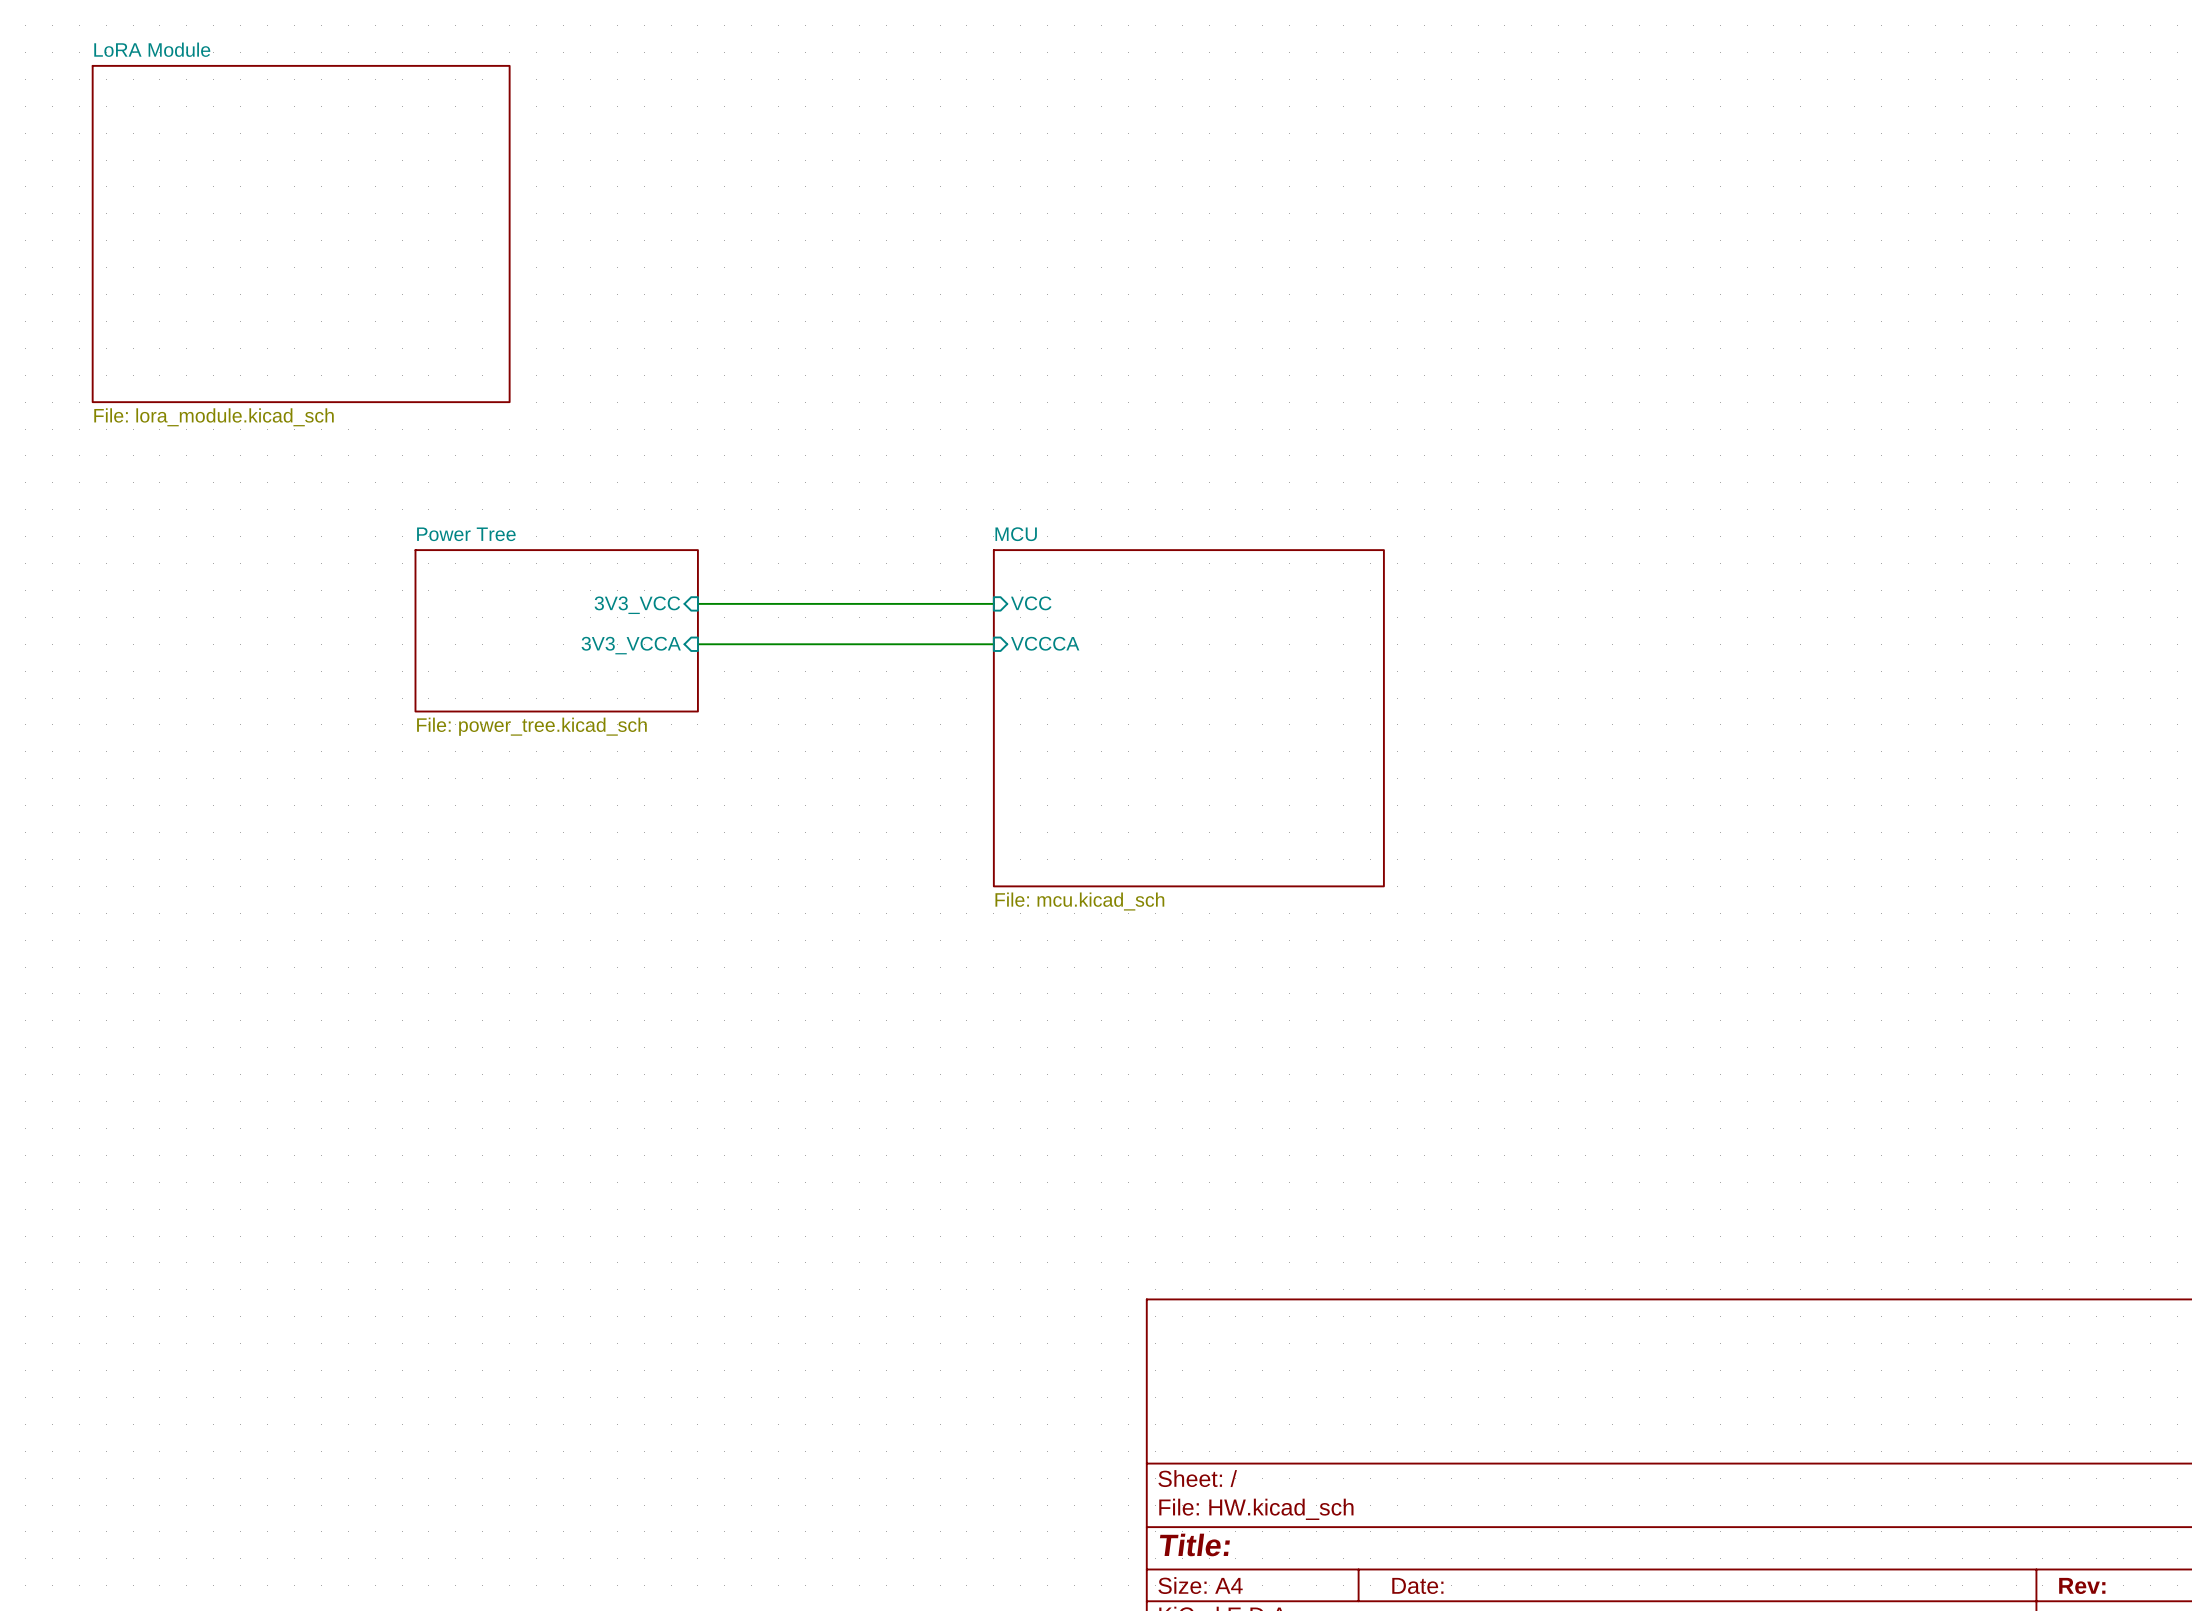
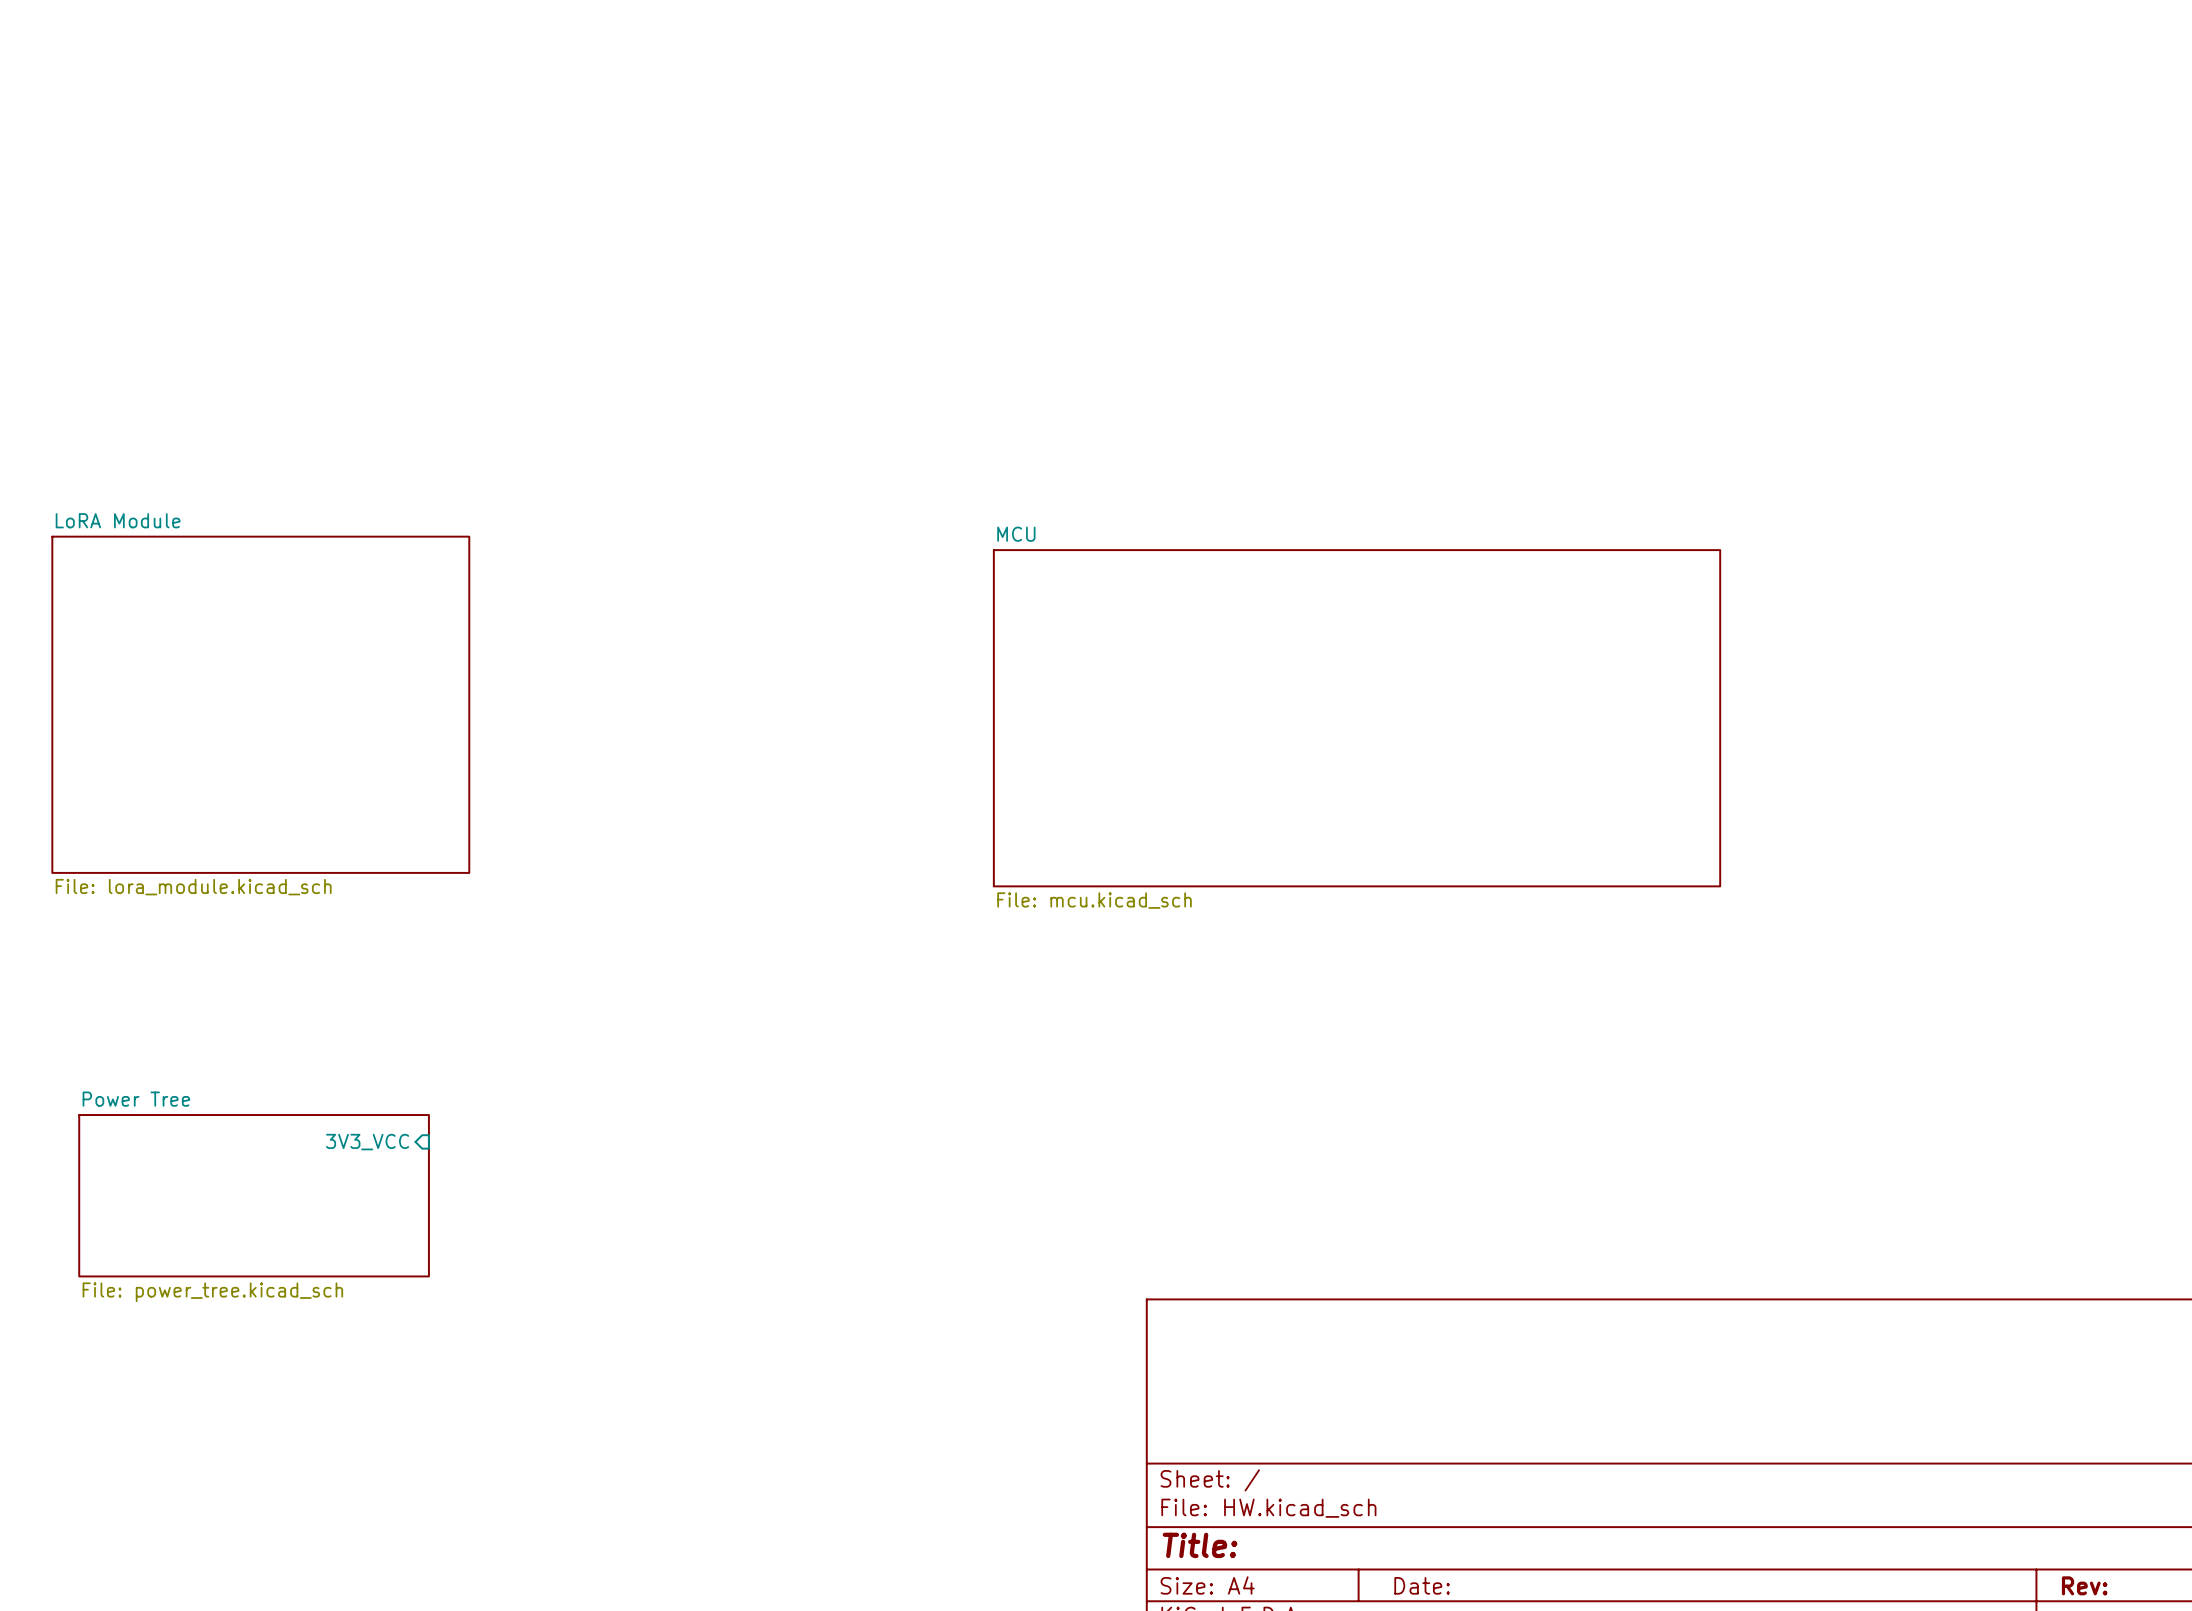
sheet LoRA Module: File: lora_module.kicad_sch (301, 234) -> none
wire: (697, 603) (993, 603) -> none
sheet pin: VCC (1031, 603) -> none
sheet pin: 3V3_VCC (637, 605) -> none
sheet Power Tree: File: power_tree.kicad_sch (556, 630) -> none
sheet pin: VCCCA (1045, 643) -> none
wire: (697, 644) (993, 644) -> none
sheet pin: 3V3_VCCA (631, 645) -> none
sheet LoRA Module: none -> File: lora_module.kicad_sch (260, 704)
sheet MCU: File: mcu.kicad_sch (1188, 718) -> none
sheet MCU: none -> File: mcu.kicad_sch (1357, 718)
sheet pin: none -> 3V3_VCC (367, 1142)
sheet Power Tree: none -> File: power_tree.kicad_sch (254, 1195)

